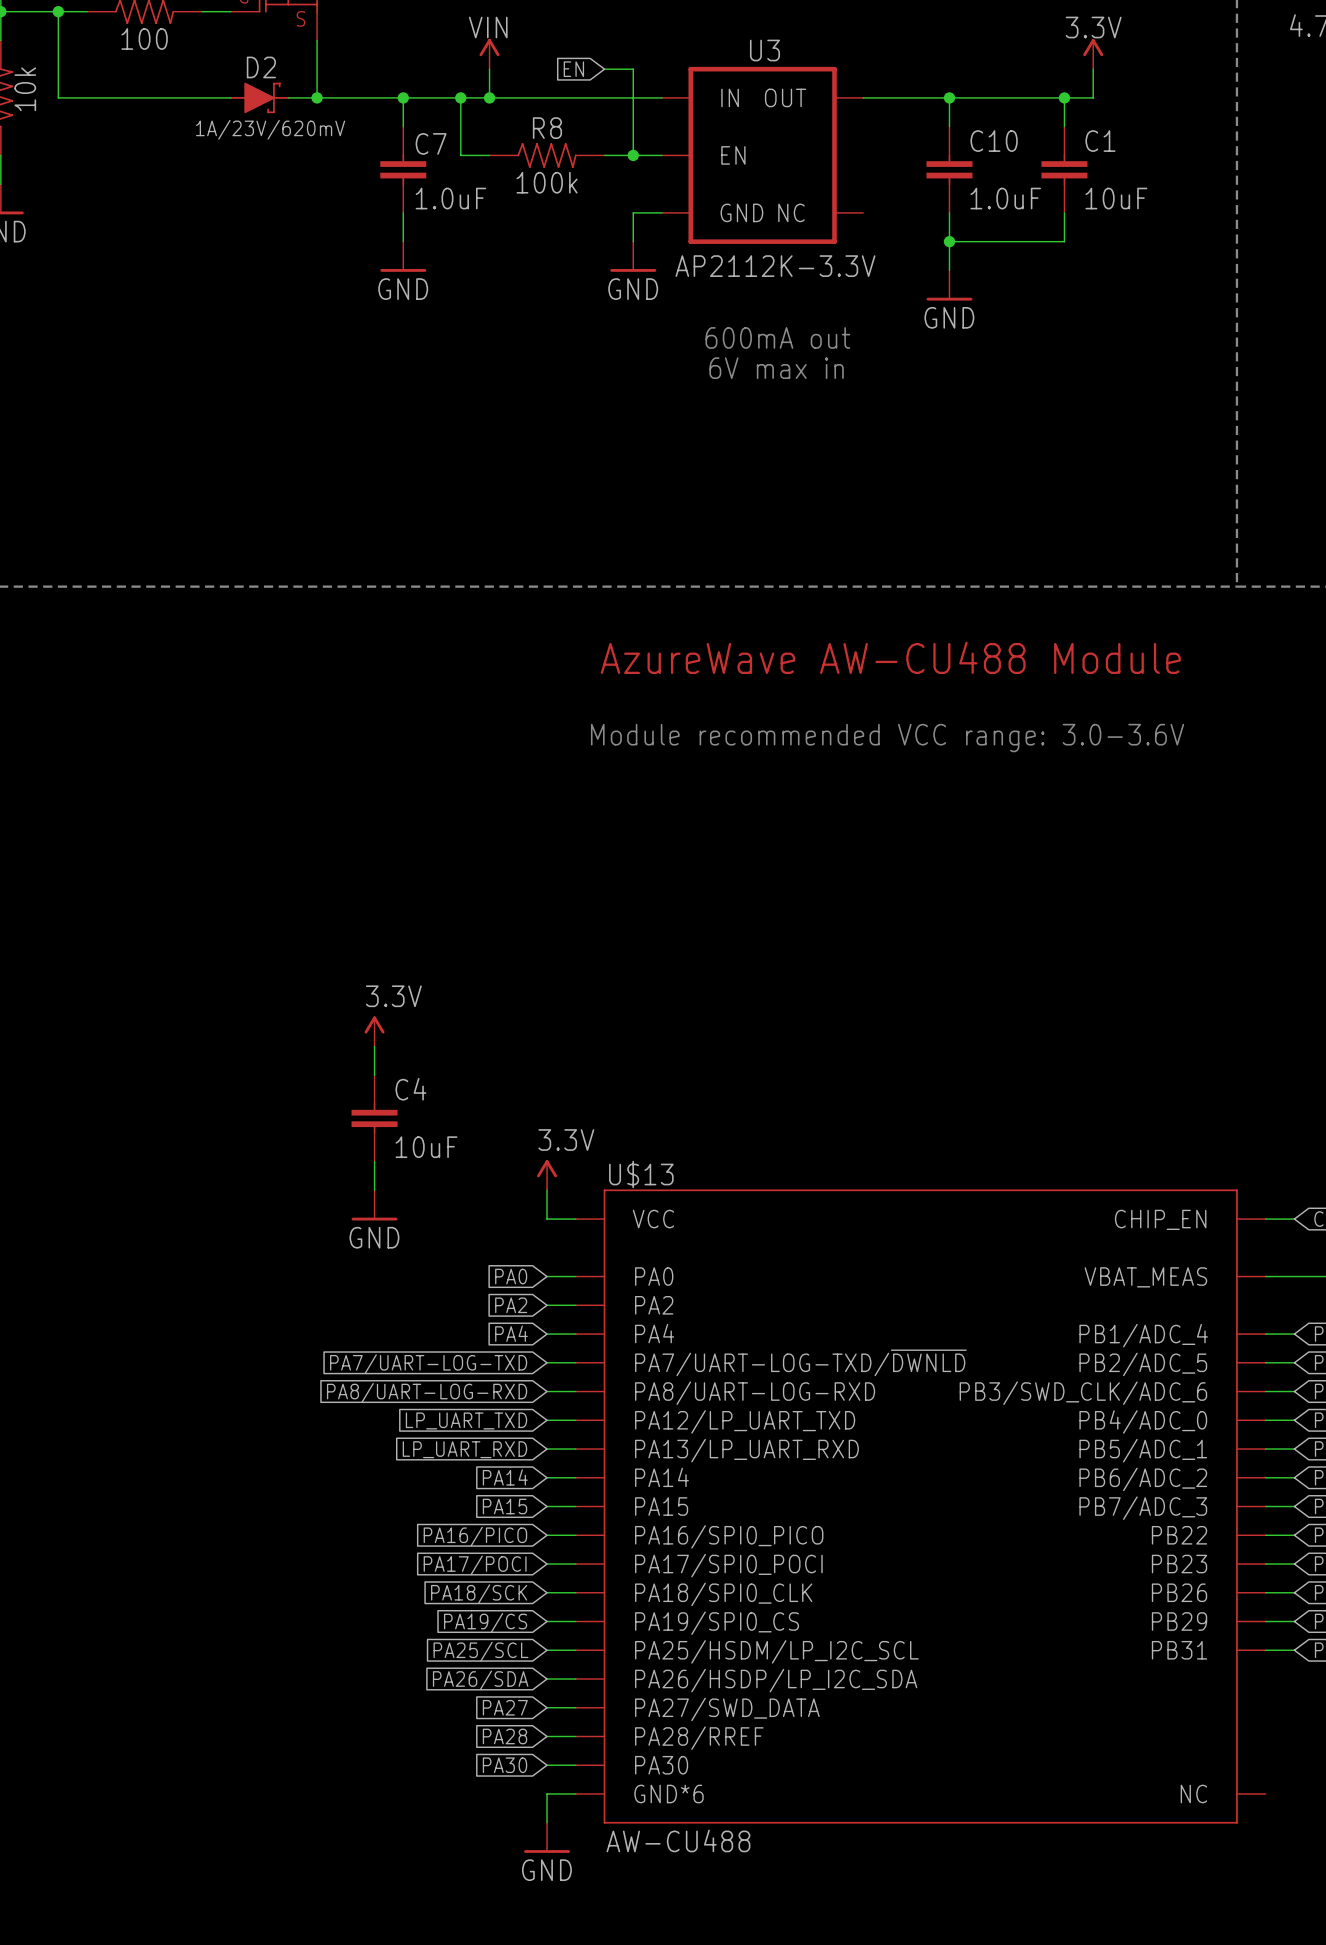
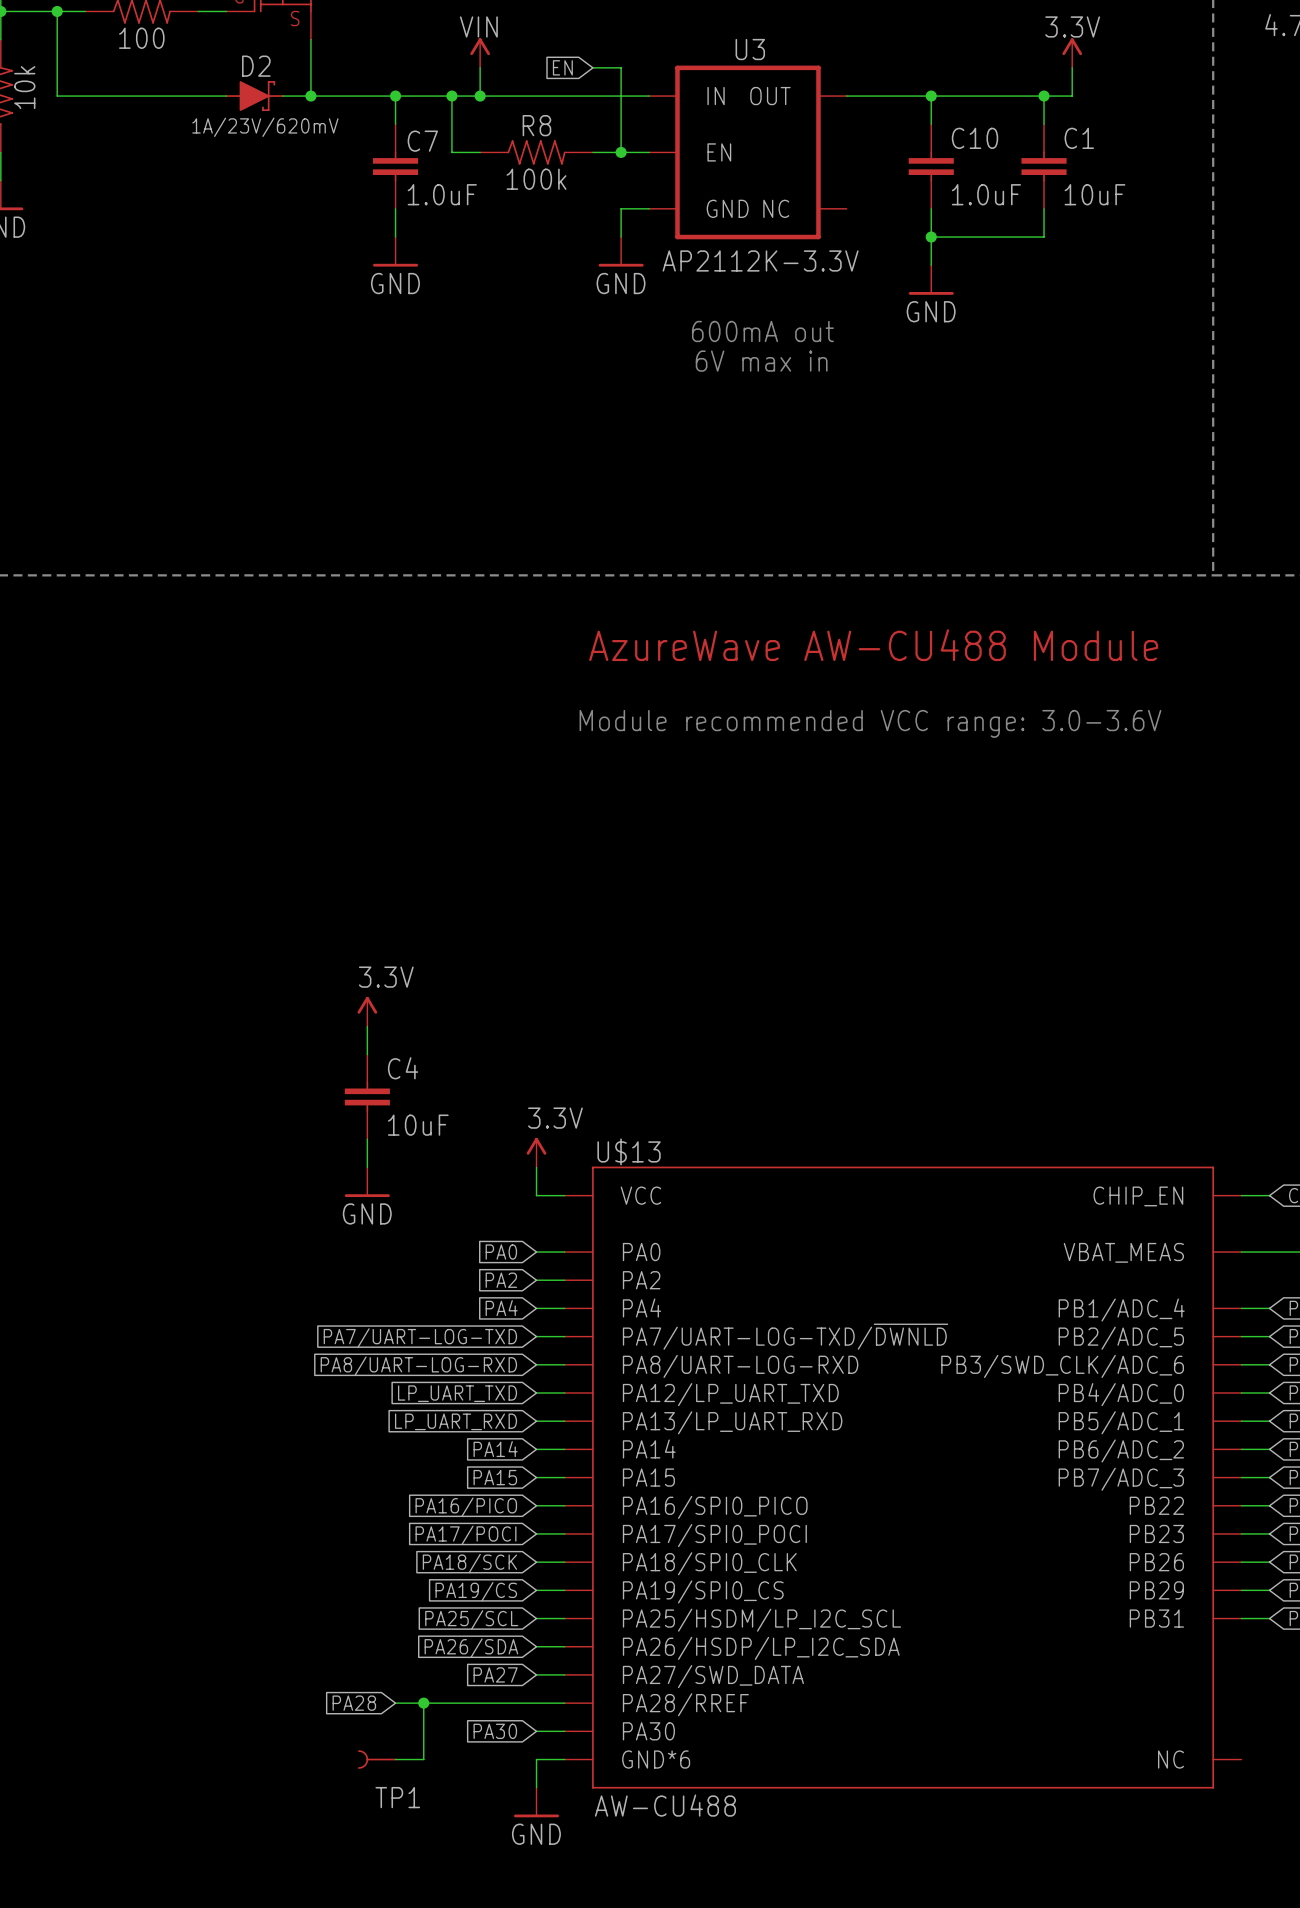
wire: none -> (395, 1703) (536, 1703)
wire: none -> (423, 1703) (423, 1759) (395, 1759)
junction: none -> (423, 1703)
global label position: PA28 (505, 1736) -> PA28 (354, 1703)
TP1: none -> (377, 1759)

